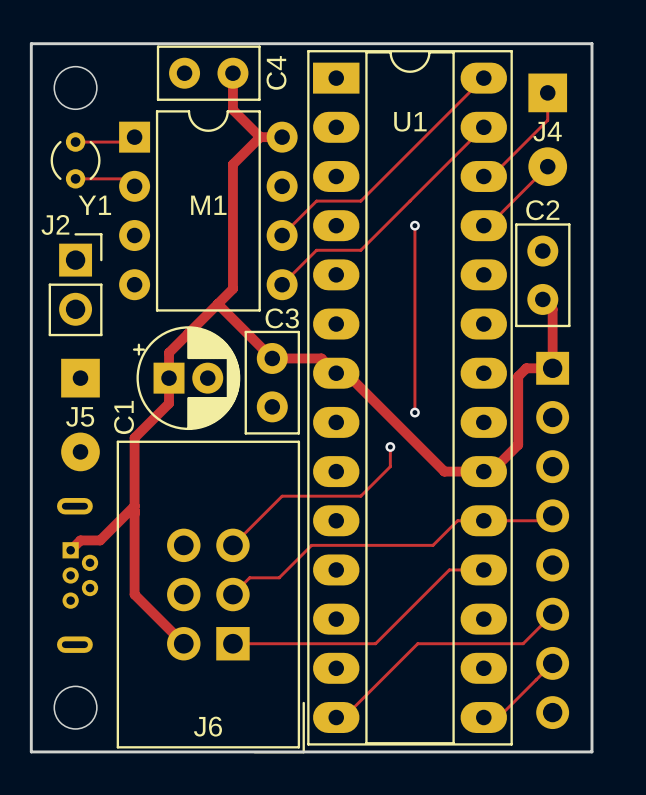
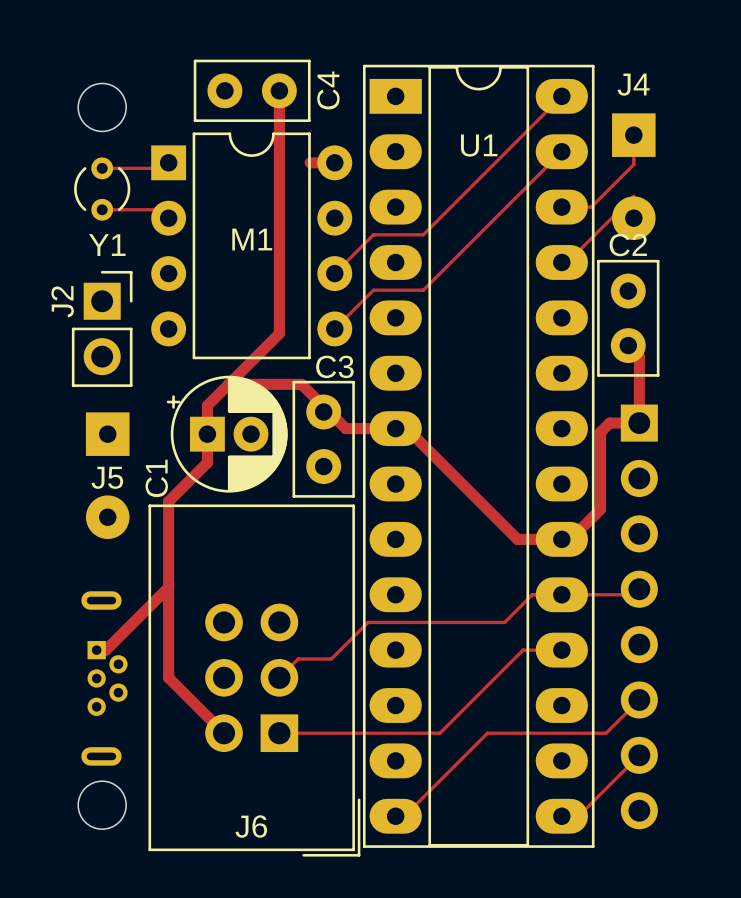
board edge: (31, 43) (31, 751) (591, 751) (591, 43) (31, 43) -> none
track: (232, 109) (260, 137) (232, 164) -> (279, 132) (279, 193)
track: (547, 120) (491, 176) -> (633, 143) (633, 164) (591, 207) (570, 207)
J4 position: (547, 129) -> (633, 176)
J4 name position: J4 (547, 131) -> J4 (633, 84)
Y1 name position: Y1 (94, 205) -> Y1 (107, 245)
J2 name rotation: 0° (55, 224) -> 90° counterclockwise (62, 301)
track: (414, 225) (414, 412) -> none
via: (414, 225) -> none
track: (217, 304) (272, 358) (321, 358) (336, 373) -> (228, 384) (301, 384) (345, 428) (395, 428)
via: (414, 412) -> none
track: (390, 447) (390, 466) (360, 496) (282, 496) (232, 545) -> none
via: (390, 447) -> none
track: (134, 506) (100, 540) (80, 540) (70, 550) -> none
track: none -> (168, 587) (105, 650) (96, 650)
part position: (77, 575) -> (104, 678)

